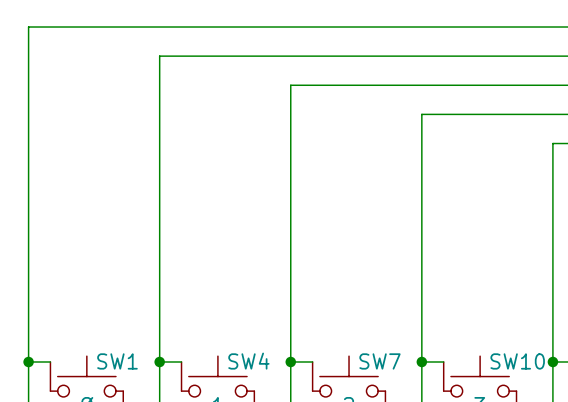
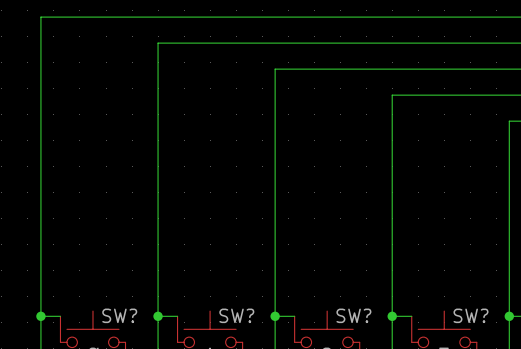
SW1 name: SW1 (117, 361) -> SW? (119, 315)
SW4 name: SW4 (248, 361) -> SW? (236, 315)
SW7 name: SW7 (379, 361) -> SW? (353, 315)
SW10 name: SW10 (517, 361) -> SW? (470, 315)

